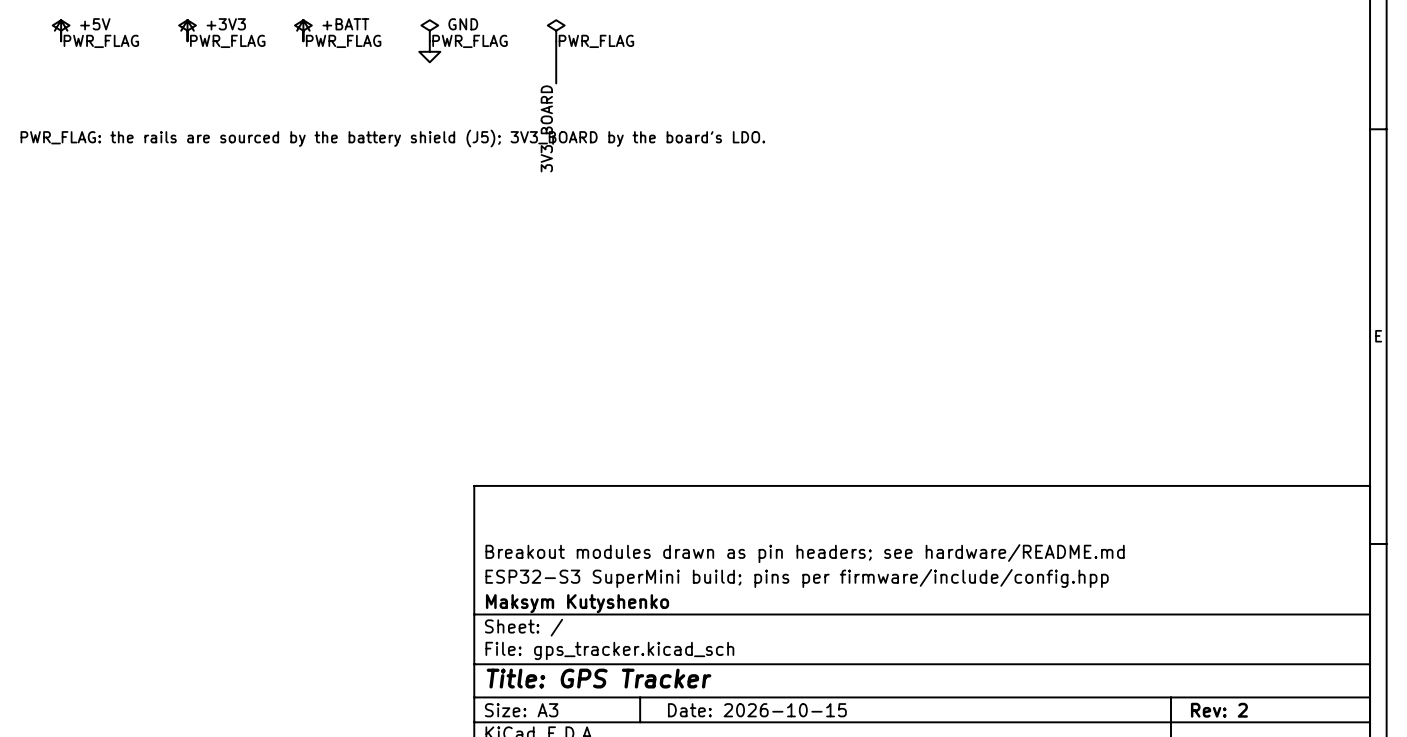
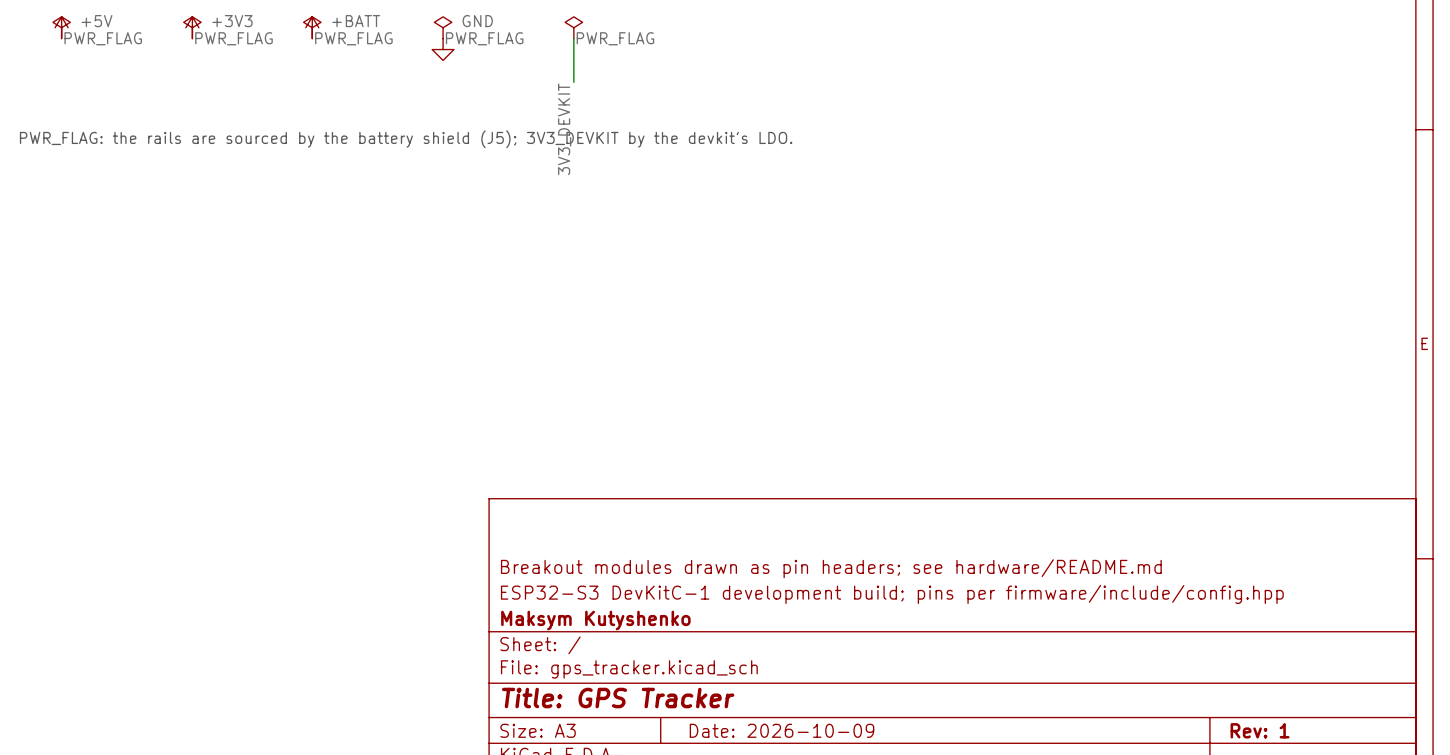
label: 3V3_BOARD (547, 128) -> 3V3_DEVKIT (564, 129)
text: PWR_FLAG: the rails are sourced by the battery shield (J5); 3V3_BOARD by the board's LDO. (392, 138) -> PWR_FLAG: the rails are sourced by the battery shield (J5); 3V3_DEVKIT by the devkit's LDO. (406, 139)
title block: ESP32-S3 SuperMini build; pins per firmware/include/config.hpp (797, 578) -> ESP32-S3 DevKitC-1 development build; pins per firmware/include/config.hpp (892, 594)
title block: Date: 2026-10-15 (757, 710) -> Date: 2026-10-09 (782, 730)
title block: Rev: 2 (1219, 710) -> Rev: 1 (1260, 730)

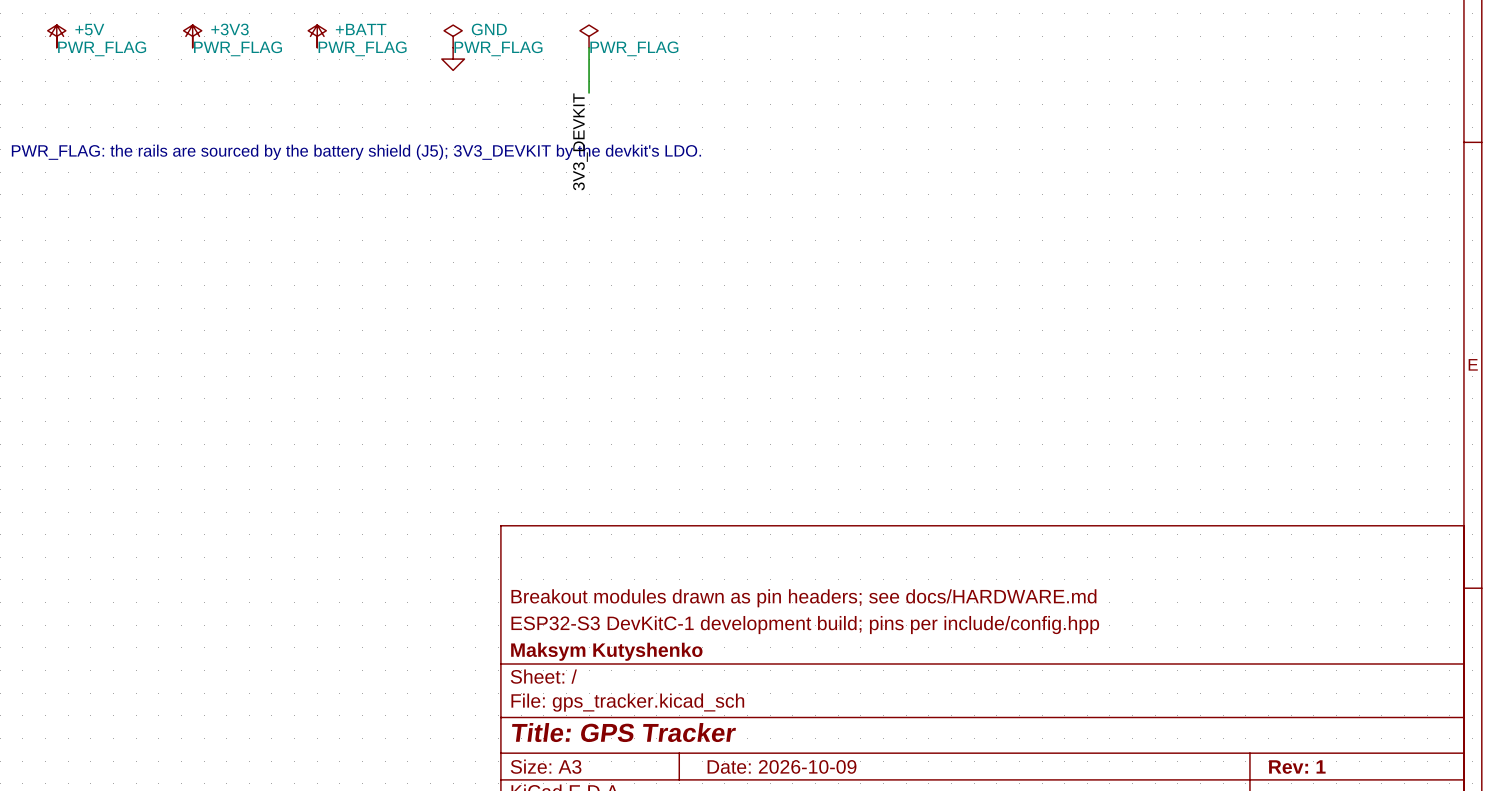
title block: Breakout modules drawn as pin headers; see hardware/README.md (831, 568) -> Breakout modules drawn as pin headers; see docs/HARDWARE.md (803, 598)
title block: ESP32-S3 DevKitC-1 development build; pins per firmware/include/config.hpp (892, 594) -> ESP32-S3 DevKitC-1 development build; pins per include/config.hpp (805, 625)

